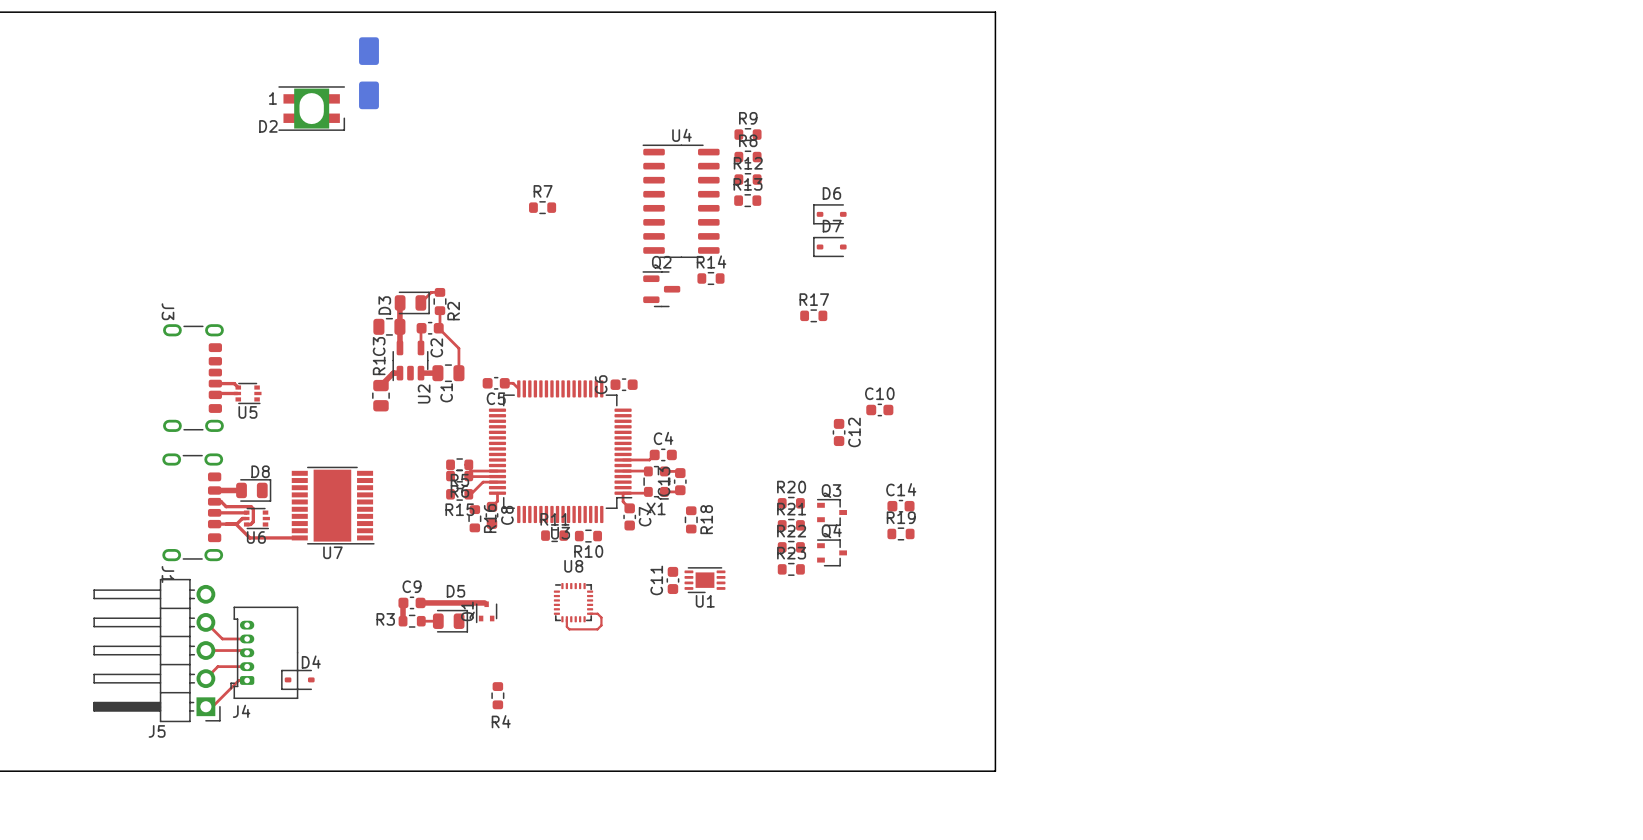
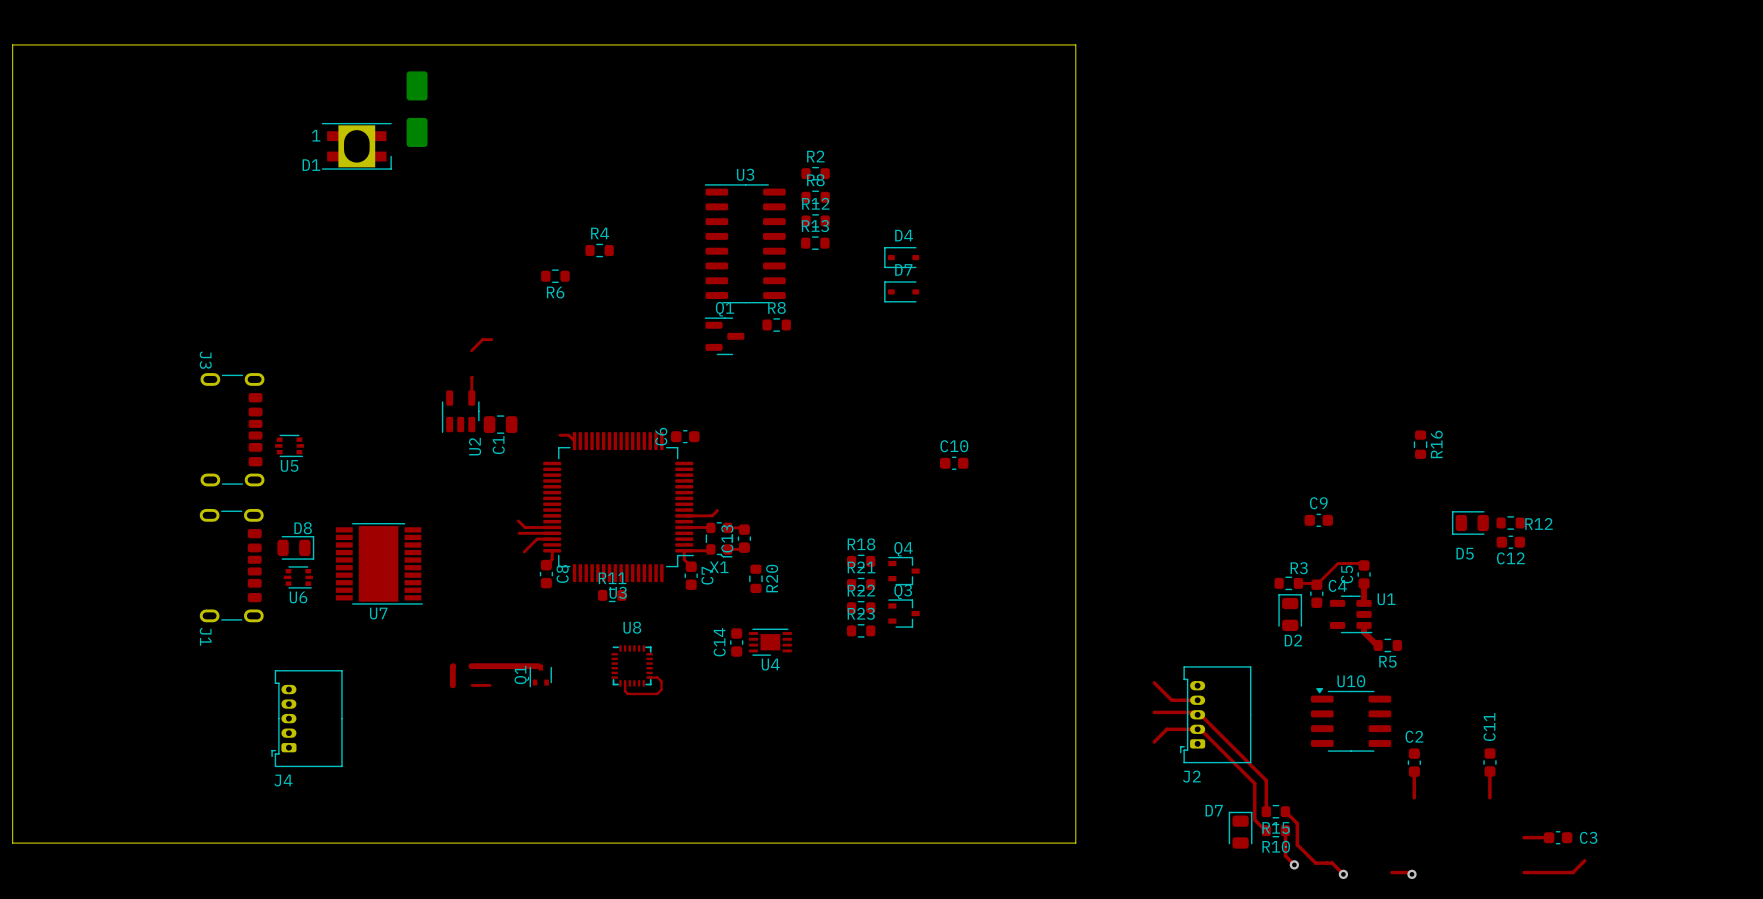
R9 name: R9 (748, 118) -> R2 (815, 156)
D2 name: D2 (268, 126) -> D1 (311, 165)
U4 name: U4 (681, 135) -> U3 (745, 174)
R7 name: R7 (543, 191) -> R4 (600, 233)
D6 name: D6 (831, 193) -> D4 (904, 235)
Q2 name: Q2 (661, 262) -> Q1 (724, 309)
R14 name: R14 (711, 262) -> R8 (776, 307)
R2: (439, 301) -> none
D3: (412, 302) -> none
top track: (439, 310) (438, 328) (458, 348) (458, 373) -> none
R17: (813, 315) -> none
C3 footprint: [373, 318, 406, 336] -> [1543, 831, 1573, 845]
C2 rotation: 0° (430, 328) -> 90° clockwise (1414, 762)
C2 position: (430, 328) -> (1414, 762)
C3 name position: C3 (379, 346) -> C3 (1588, 837)
C2 name position: C2 (436, 347) -> C2 (1414, 736)
top track: (399, 373) (393, 373) (380, 385) -> none
top track: (420, 373) (437, 373) -> none
top track: (215, 383) (234, 383) (238, 387) -> none
C5 rotation: 0° (496, 383) -> 90° clockwise (1364, 574)
C5 position: (496, 383) -> (1364, 574)
top track: (237, 393) (215, 394) -> none
R1: (380, 395) -> none
C12 rotation: 0° (839, 432) -> 90° clockwise (1510, 542)
C12 position: (839, 432) -> (1510, 542)
C4 rotation: 0° (663, 454) -> 90° clockwise (1316, 593)
C4 position: (663, 454) -> (1316, 593)
R5 position: (459, 464) -> (1387, 645)
R12: none -> (1510, 523)
R6 position: (459, 476) -> (555, 276)
R20 name: R20 (791, 487) -> R18 (861, 544)
top track: (214, 490) (241, 490) -> none
Q3 name: Q3 (831, 491) -> Q4 (903, 549)
R15 position: (459, 494) -> (1275, 811)
top track: (214, 501) (221, 501) (226, 506) (251, 506) (253, 508) (253, 521) (246, 524) -> none
top track: none -> (1364, 563) (1338, 563) (1316, 584) (1298, 583)
C14: (900, 506) -> none
top track: (246, 512) (214, 512) -> none
top track: (245, 518) (242, 518) (236, 524) (214, 524) -> none
R16 position: (474, 518) -> (1420, 444)
R18 name: R18 (706, 519) -> R20 (772, 578)
top track: (236, 524) (249, 537) (299, 537) -> none
top track: none -> (1364, 585) (1364, 603)
Q4 name: Q4 (831, 531) -> Q3 (903, 591)
R19: (900, 533) -> none
R10 position: (588, 536) -> (1275, 830)
D2: none -> (1290, 612)
U1: none -> (1351, 614)
top track: none -> (1364, 625) (1364, 632) (1377, 645)
C11 name: C11 (656, 580) -> C14 (719, 642)
U1 name: U1 (705, 601) -> U4 (770, 664)
C9 position: (412, 602) -> (1318, 520)
top track: none -> (1154, 682) (1171, 700) (1197, 700)
R3 name position: R3 (385, 619) -> R3 (1299, 568)
R3 position: (412, 621) -> (1288, 583)
D5 rotation: 0° (450, 621) -> 180° (1470, 523)
D5 position: (450, 621) -> (1470, 523)
top track: (205, 622) (222, 638) (247, 638) -> none
top track: none -> (1154, 712) (1195, 712) (1200, 714) (1266, 780) (1266, 811)
J2: none -> (1215, 714)
J5: (157, 650) -> none
top track: (205, 650) (244, 650) (247, 652) -> none
U10: none -> (1351, 719)
top track: (247, 666) (217, 666) (205, 678) -> none
top track: none -> (1154, 741) (1166, 729) (1200, 729) (1254, 783) (1254, 819) (1266, 830)
D4: (297, 679) -> none
top track: (247, 680) (238, 680) (212, 706) (205, 706) -> none
C11: none -> (1489, 762)
R4: (497, 695) -> none
top track: none -> (1414, 771) (1414, 797)
top track: none -> (1489, 771) (1489, 797)
top track: none -> (1285, 811) (1297, 823) (1297, 844) (1315, 863) (1332, 863) (1343, 874)
D7: none -> (1240, 830)
top track: none -> (1285, 830) (1285, 856) (1294, 864)
top track: none -> (1523, 837) (1549, 837)
top track: none -> (1584, 860) (1572, 872) (1523, 872)
via: none -> (1294, 864)
top track: none -> (1391, 872) (1410, 872) (1411, 874)
via: none -> (1343, 874)
via: none -> (1411, 874)

